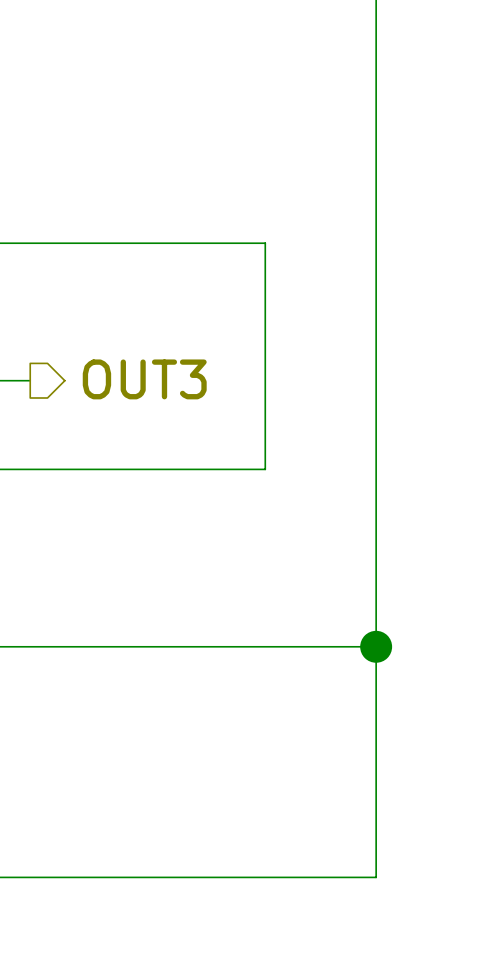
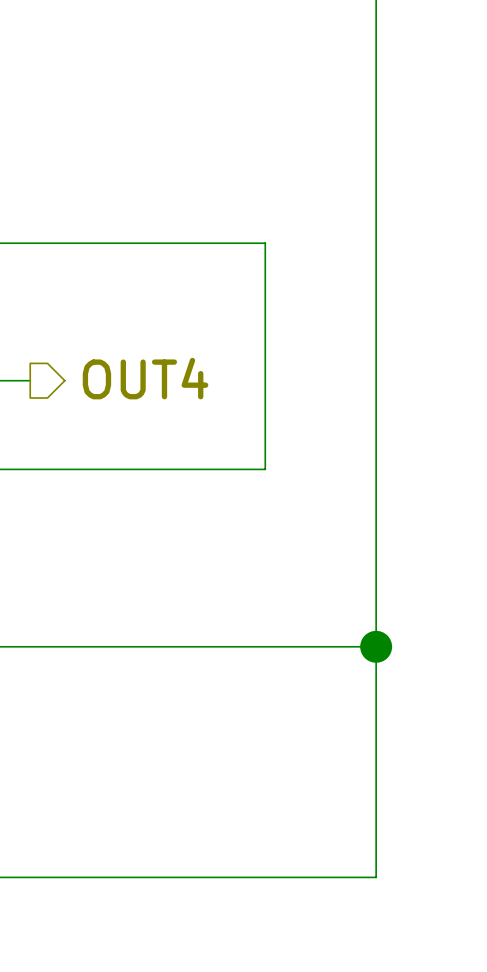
hierarchical label: OUT3 (144, 379) -> OUT4 (145, 378)

